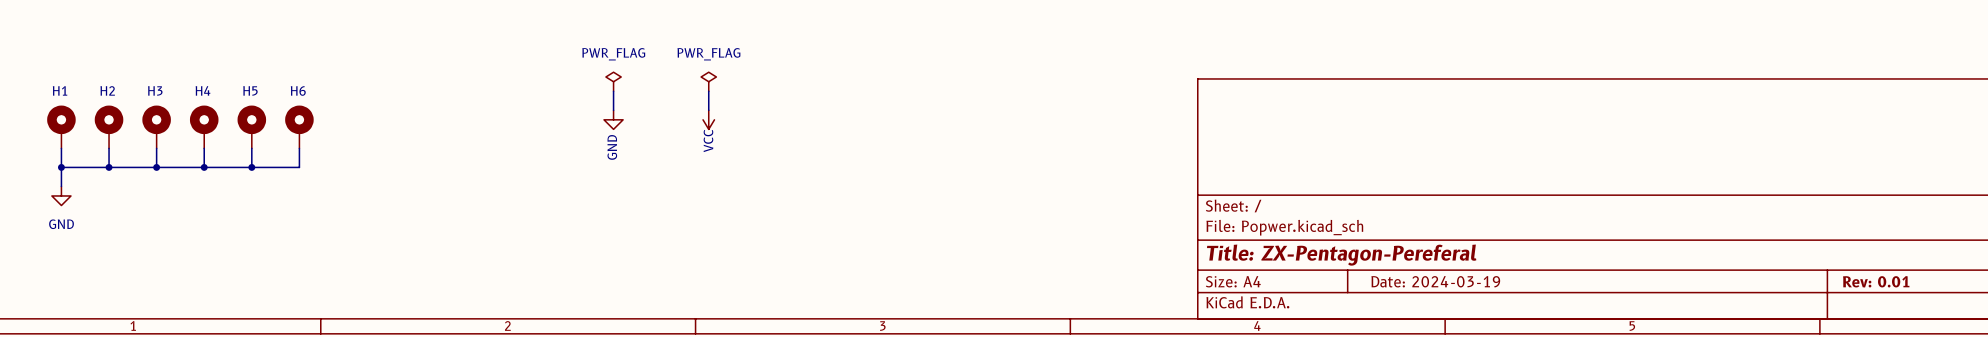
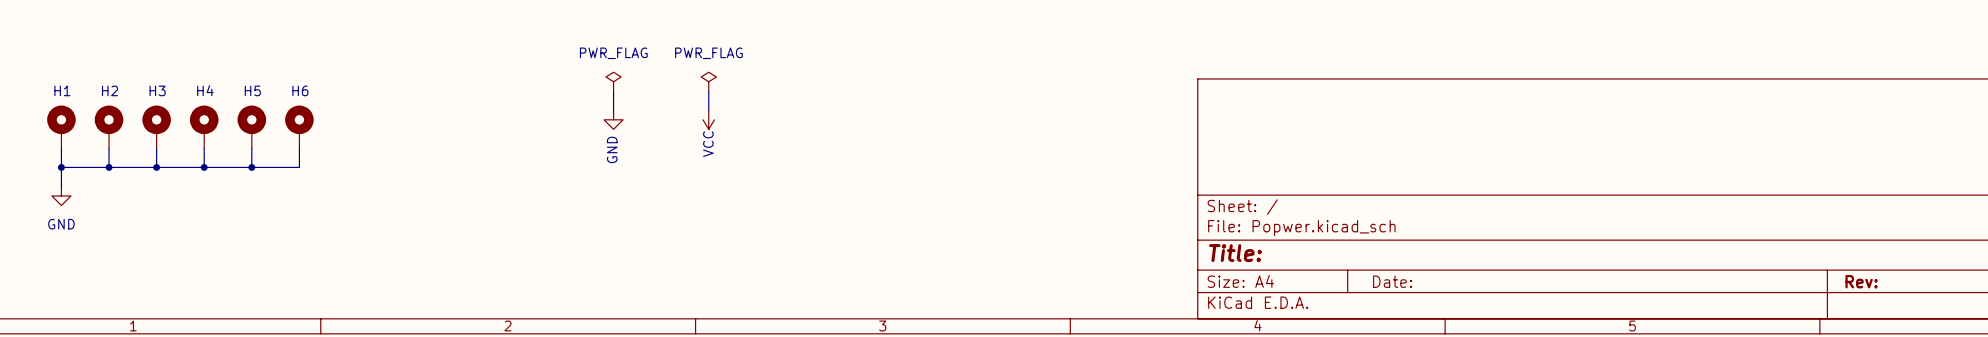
title block: Title: ZX-Pentagon-Pereferal (1341, 255) -> Title: (1235, 253)
title block: Date: 2024-03-19 (1435, 281) -> Date: (1392, 281)
title block: Rev: 0.01 (1876, 281) -> Rev: (1861, 281)

